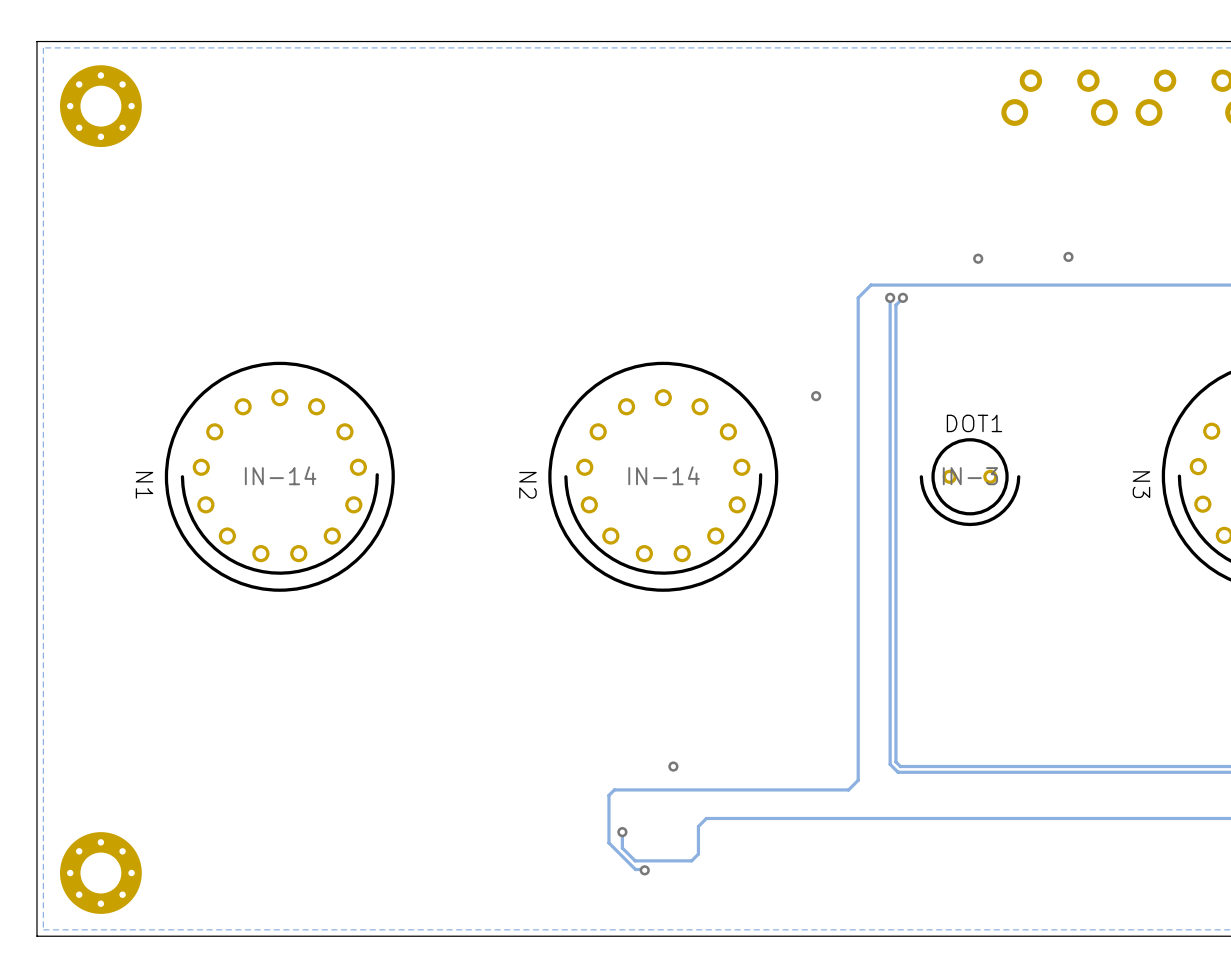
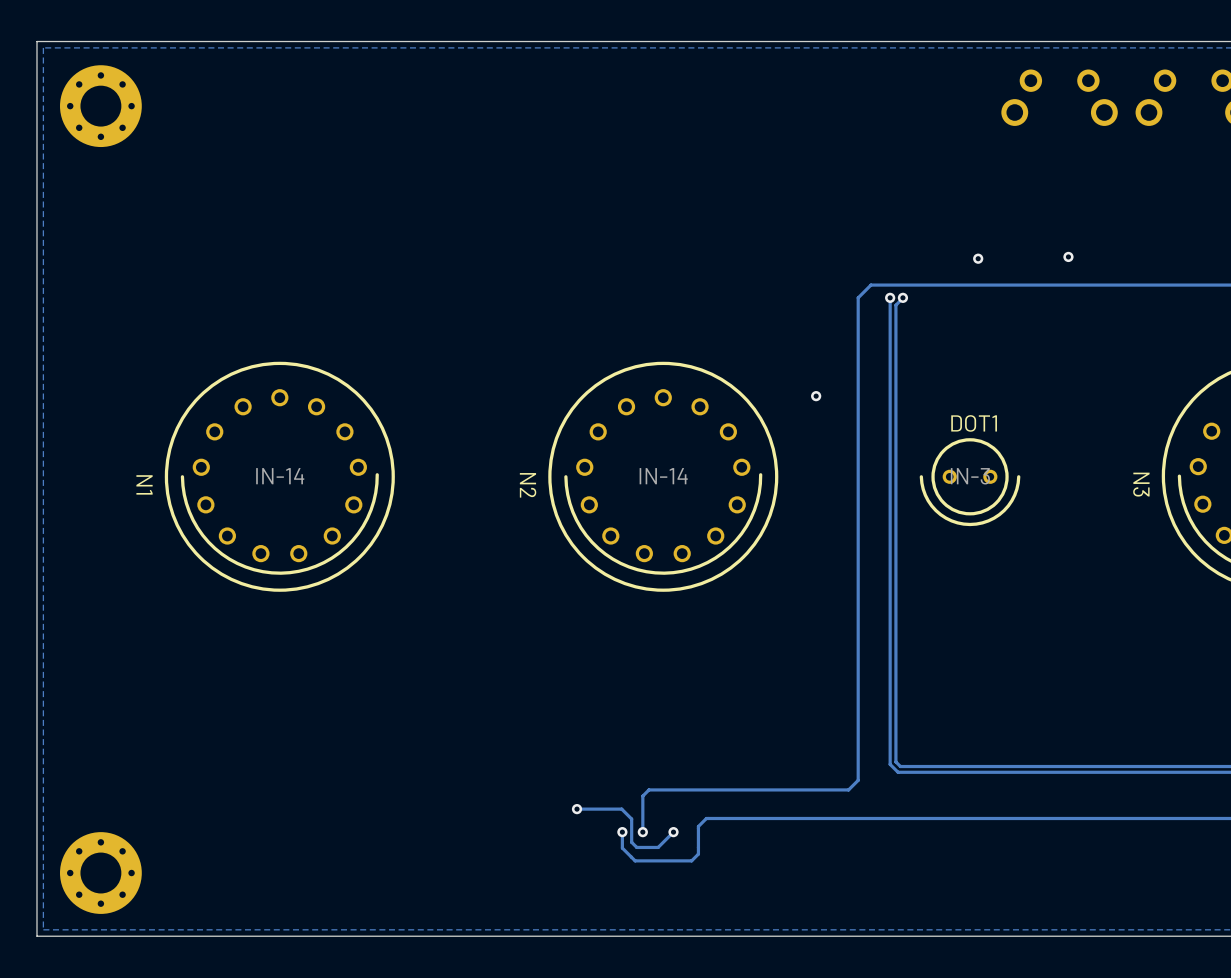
via: (673, 766) -> none
track: (648, 789) (614, 789) (608, 795) (608, 842) (635, 869) (644, 870) -> (648, 789) (642, 796) (642, 832)
track: none -> (577, 809) (621, 809) (631, 819) (631, 842) (636, 847) (658, 847) (673, 832)
via: none -> (577, 809)
via: none -> (642, 832)
via: none -> (673, 832)
via: (644, 870) -> none

